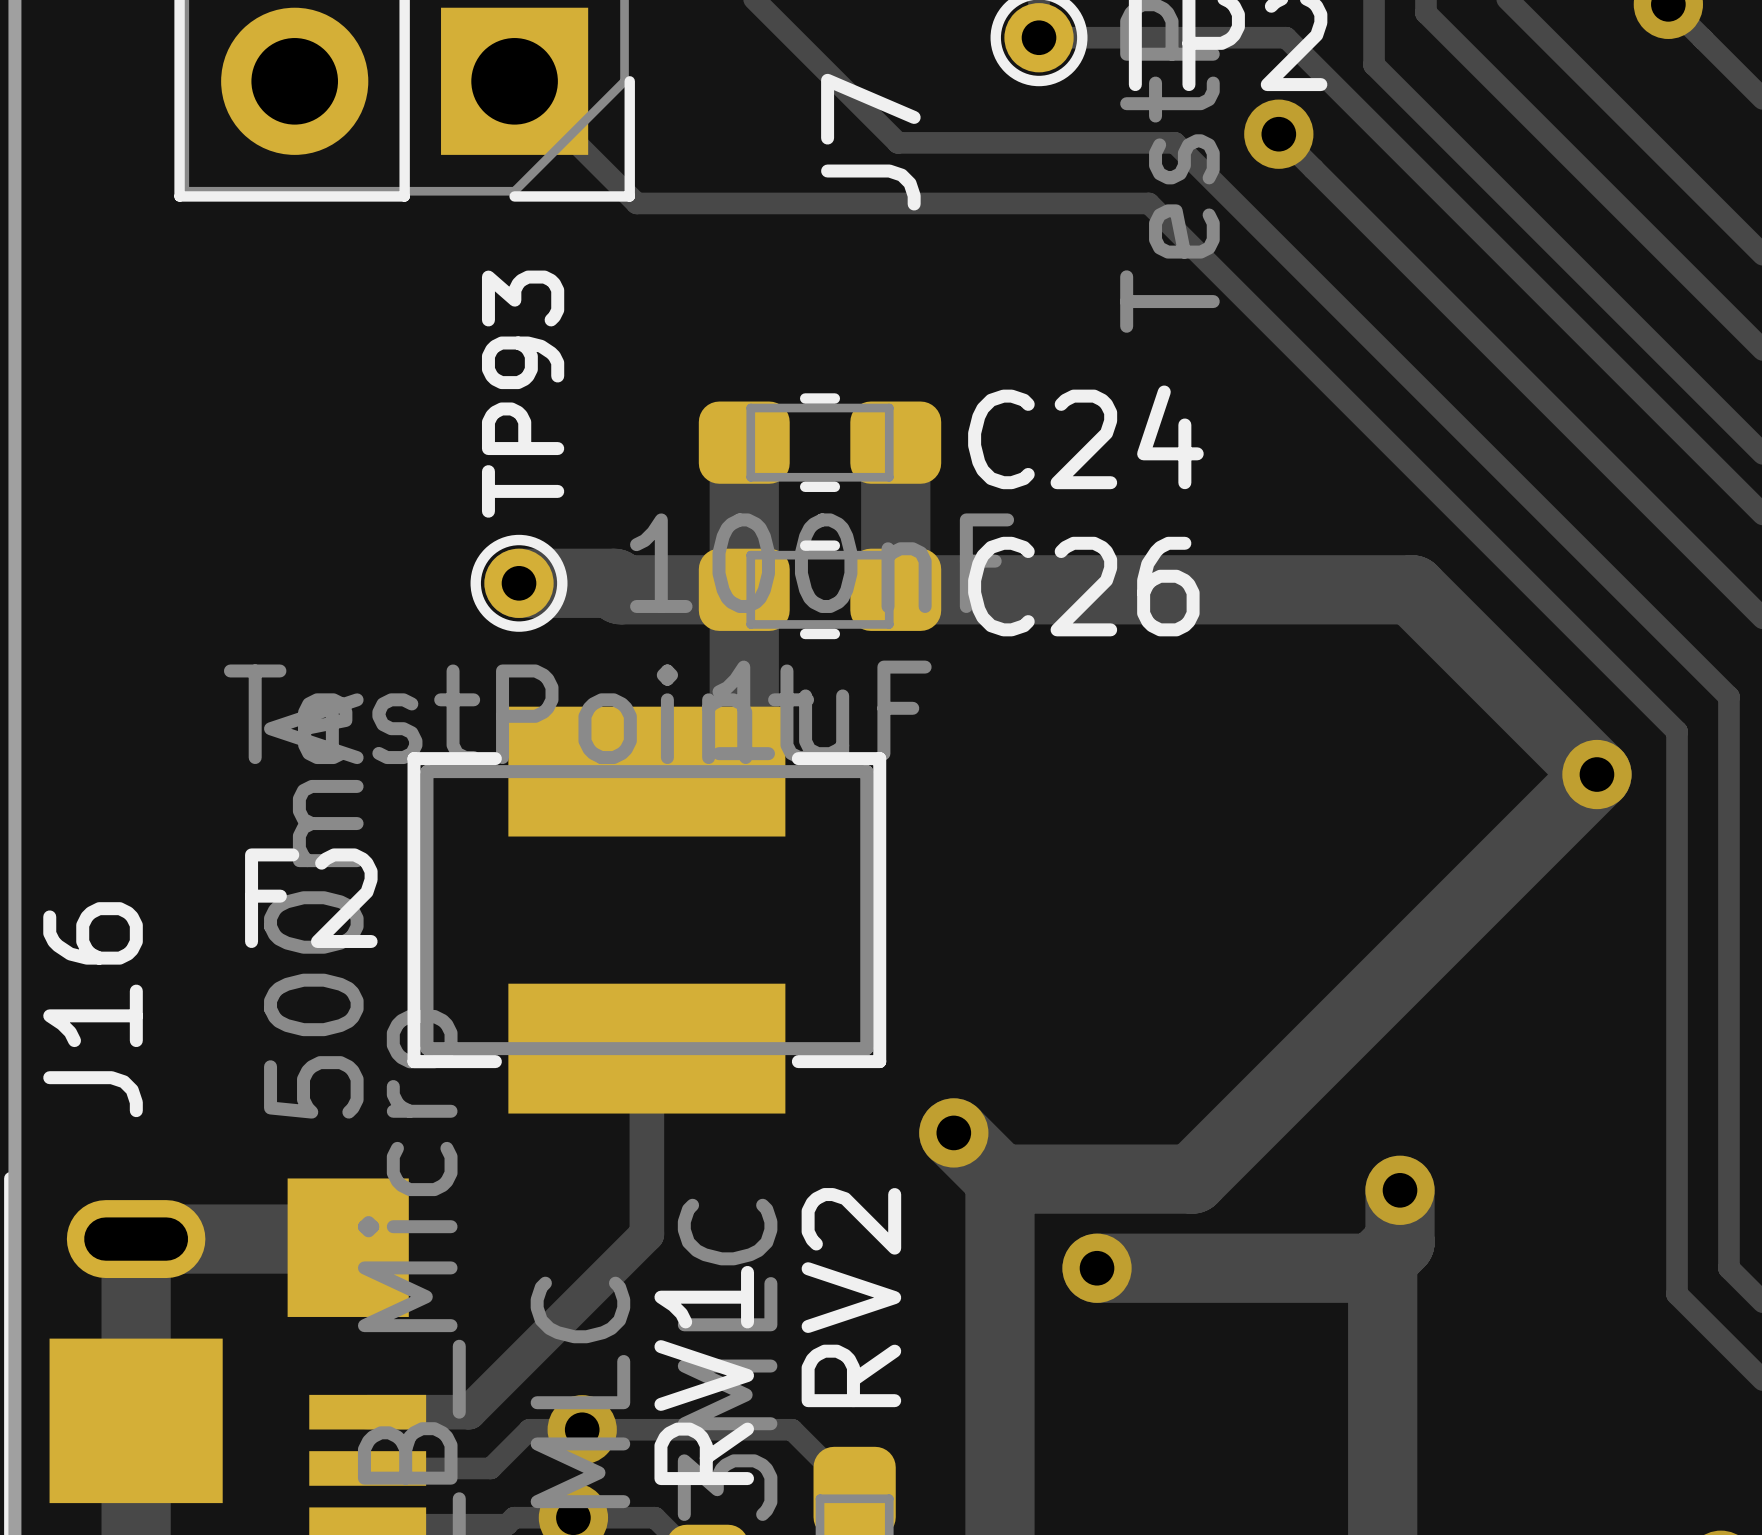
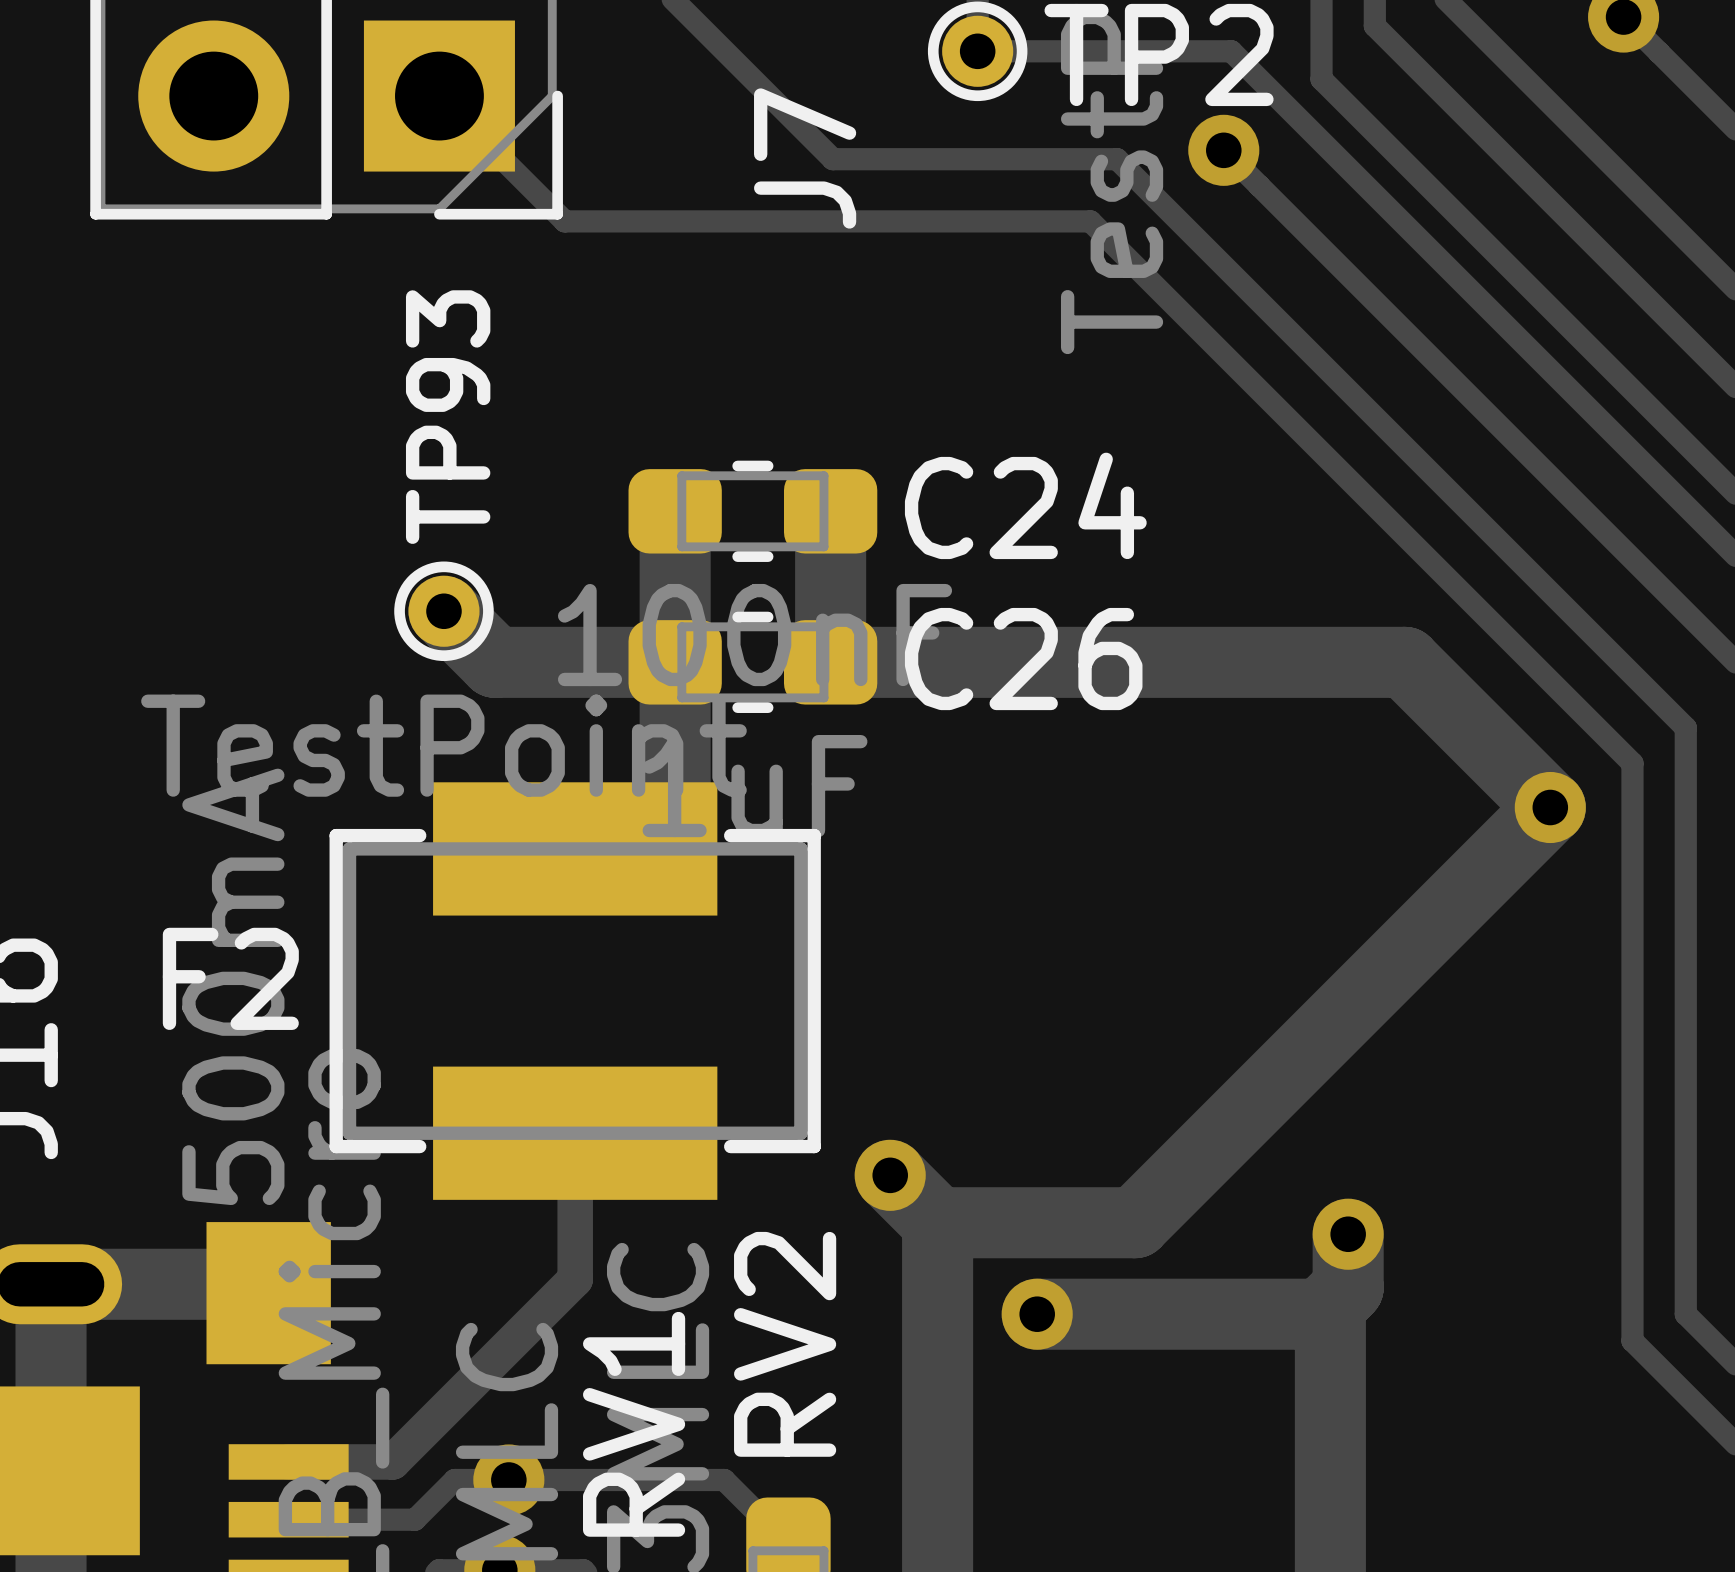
C24 position: (820, 442) -> (752, 511)
track: (519, 583) (614, 583) (620, 589) (744, 589) -> (443, 611) (495, 662) (675, 662)
C26 position: (820, 589) -> (752, 662)
track: (895, 589) (1412, 589) (1455, 633) -> (830, 617) (830, 662) (1405, 662)
F2 position: (646, 910) -> (575, 991)

